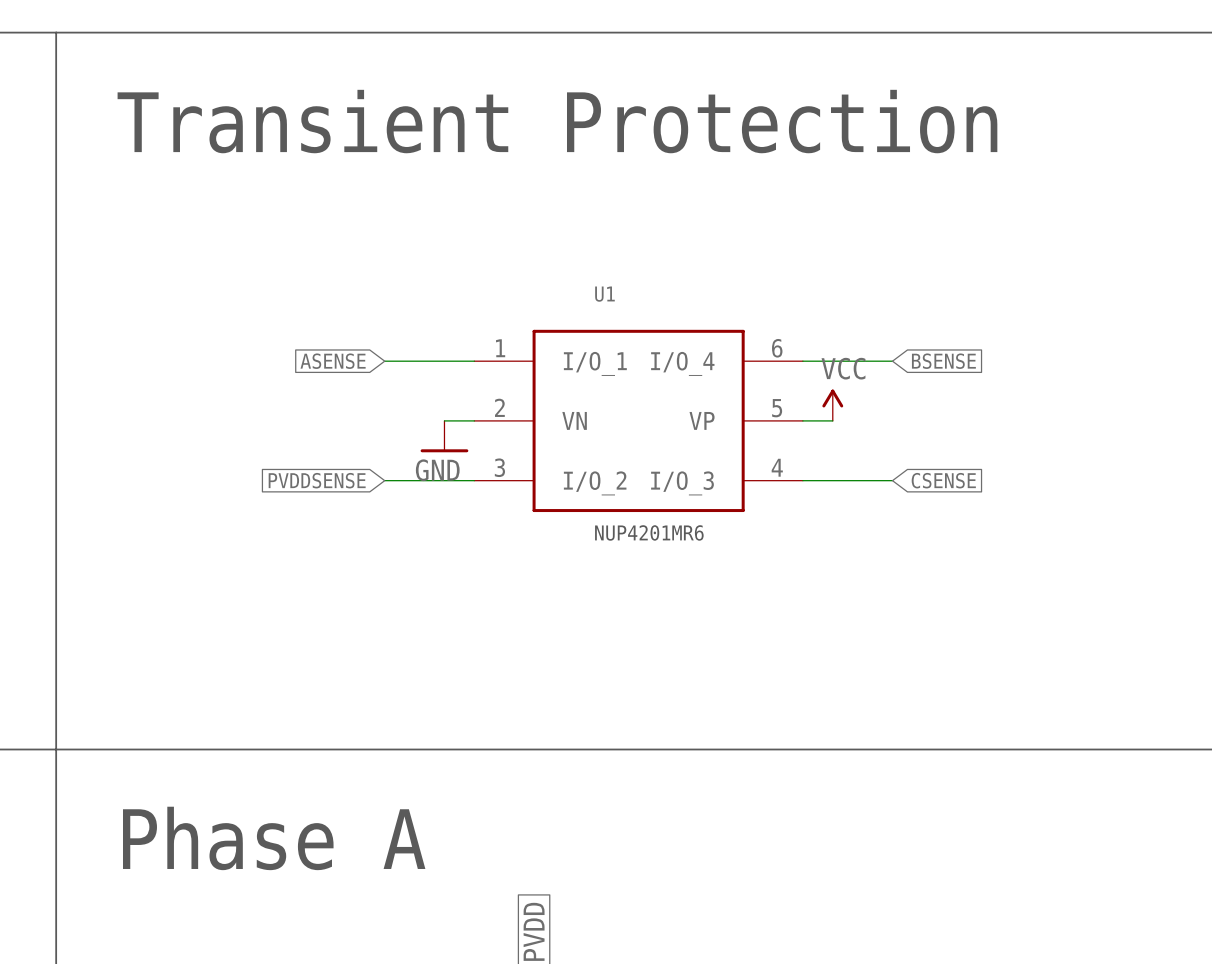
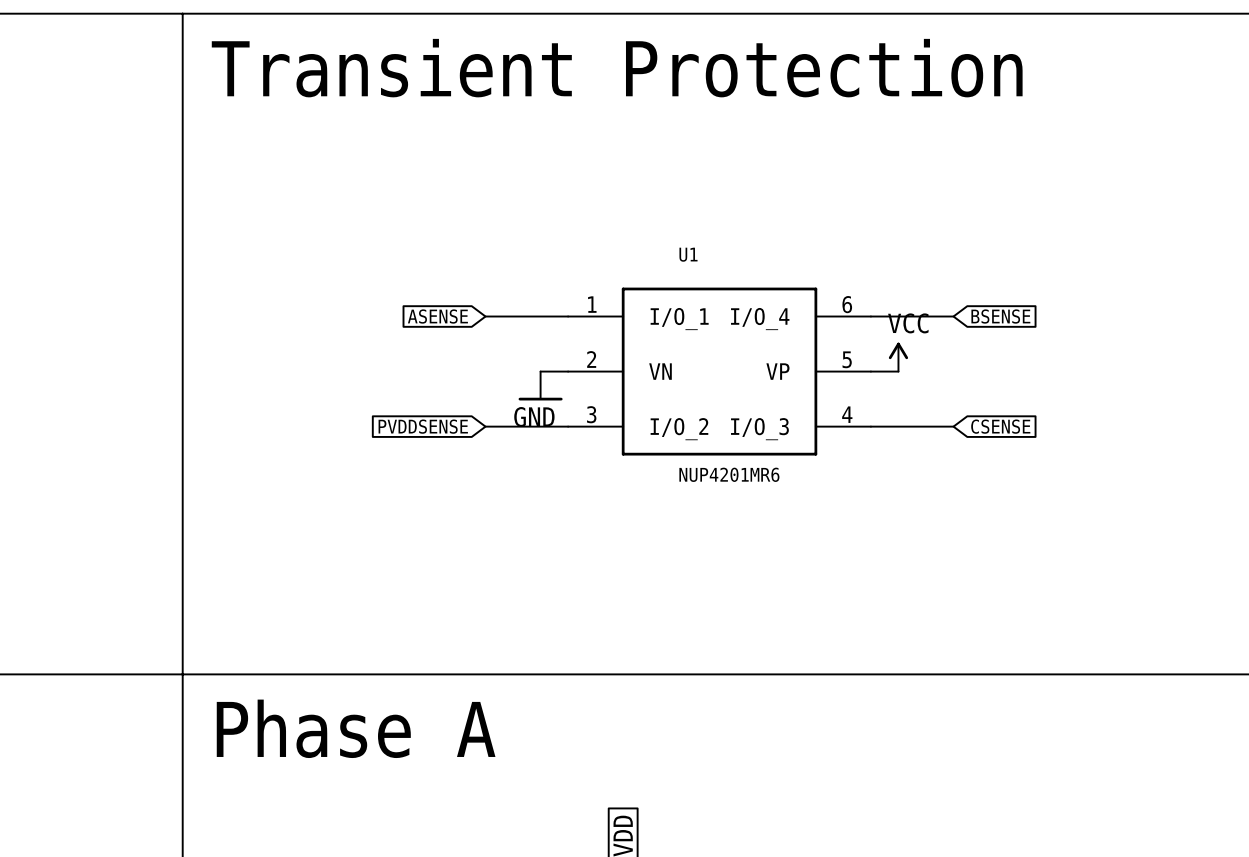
text position: Transient Protection (557, 121) -> Transient Protection (617, 68)
text position: Phase A (274, 838) -> Phase A (356, 728)

